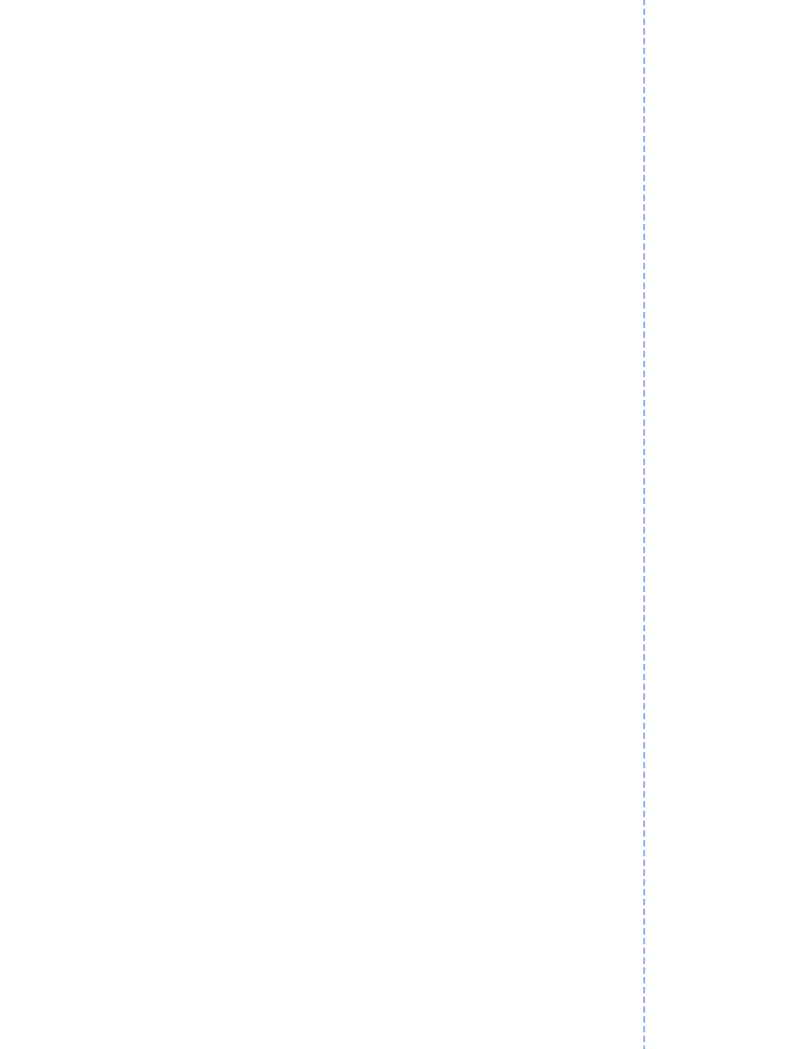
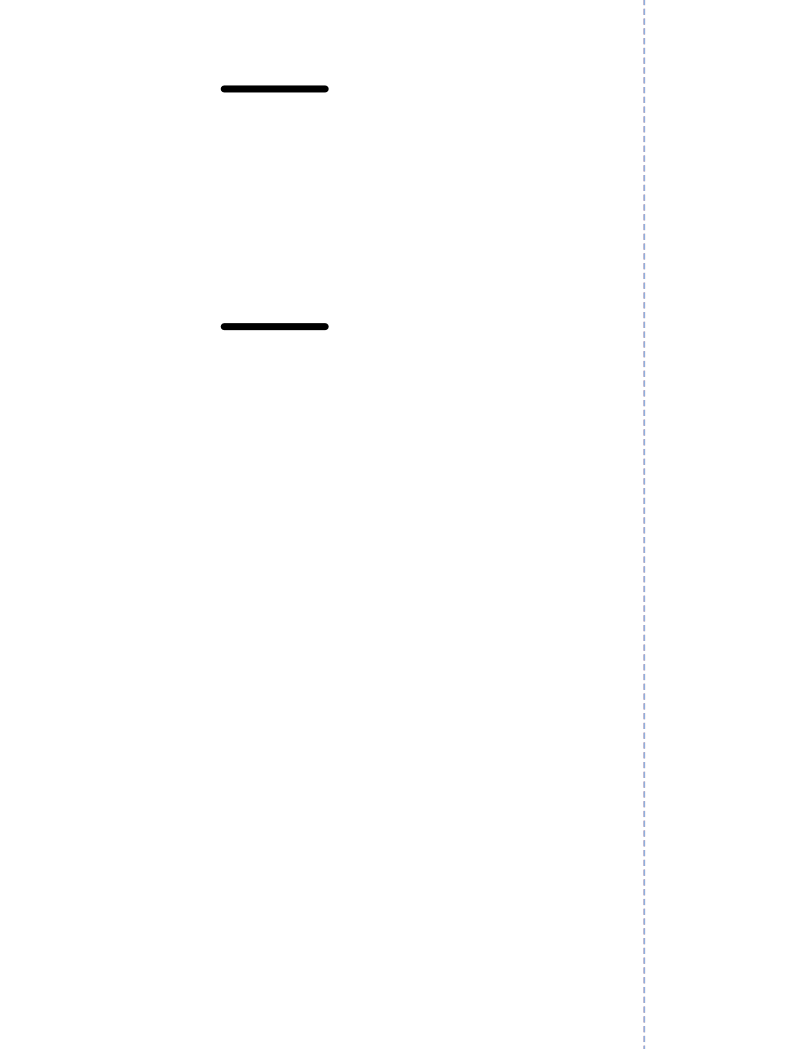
line: none -> (325, 88) (224, 88)
line: none -> (325, 326) (224, 326)

